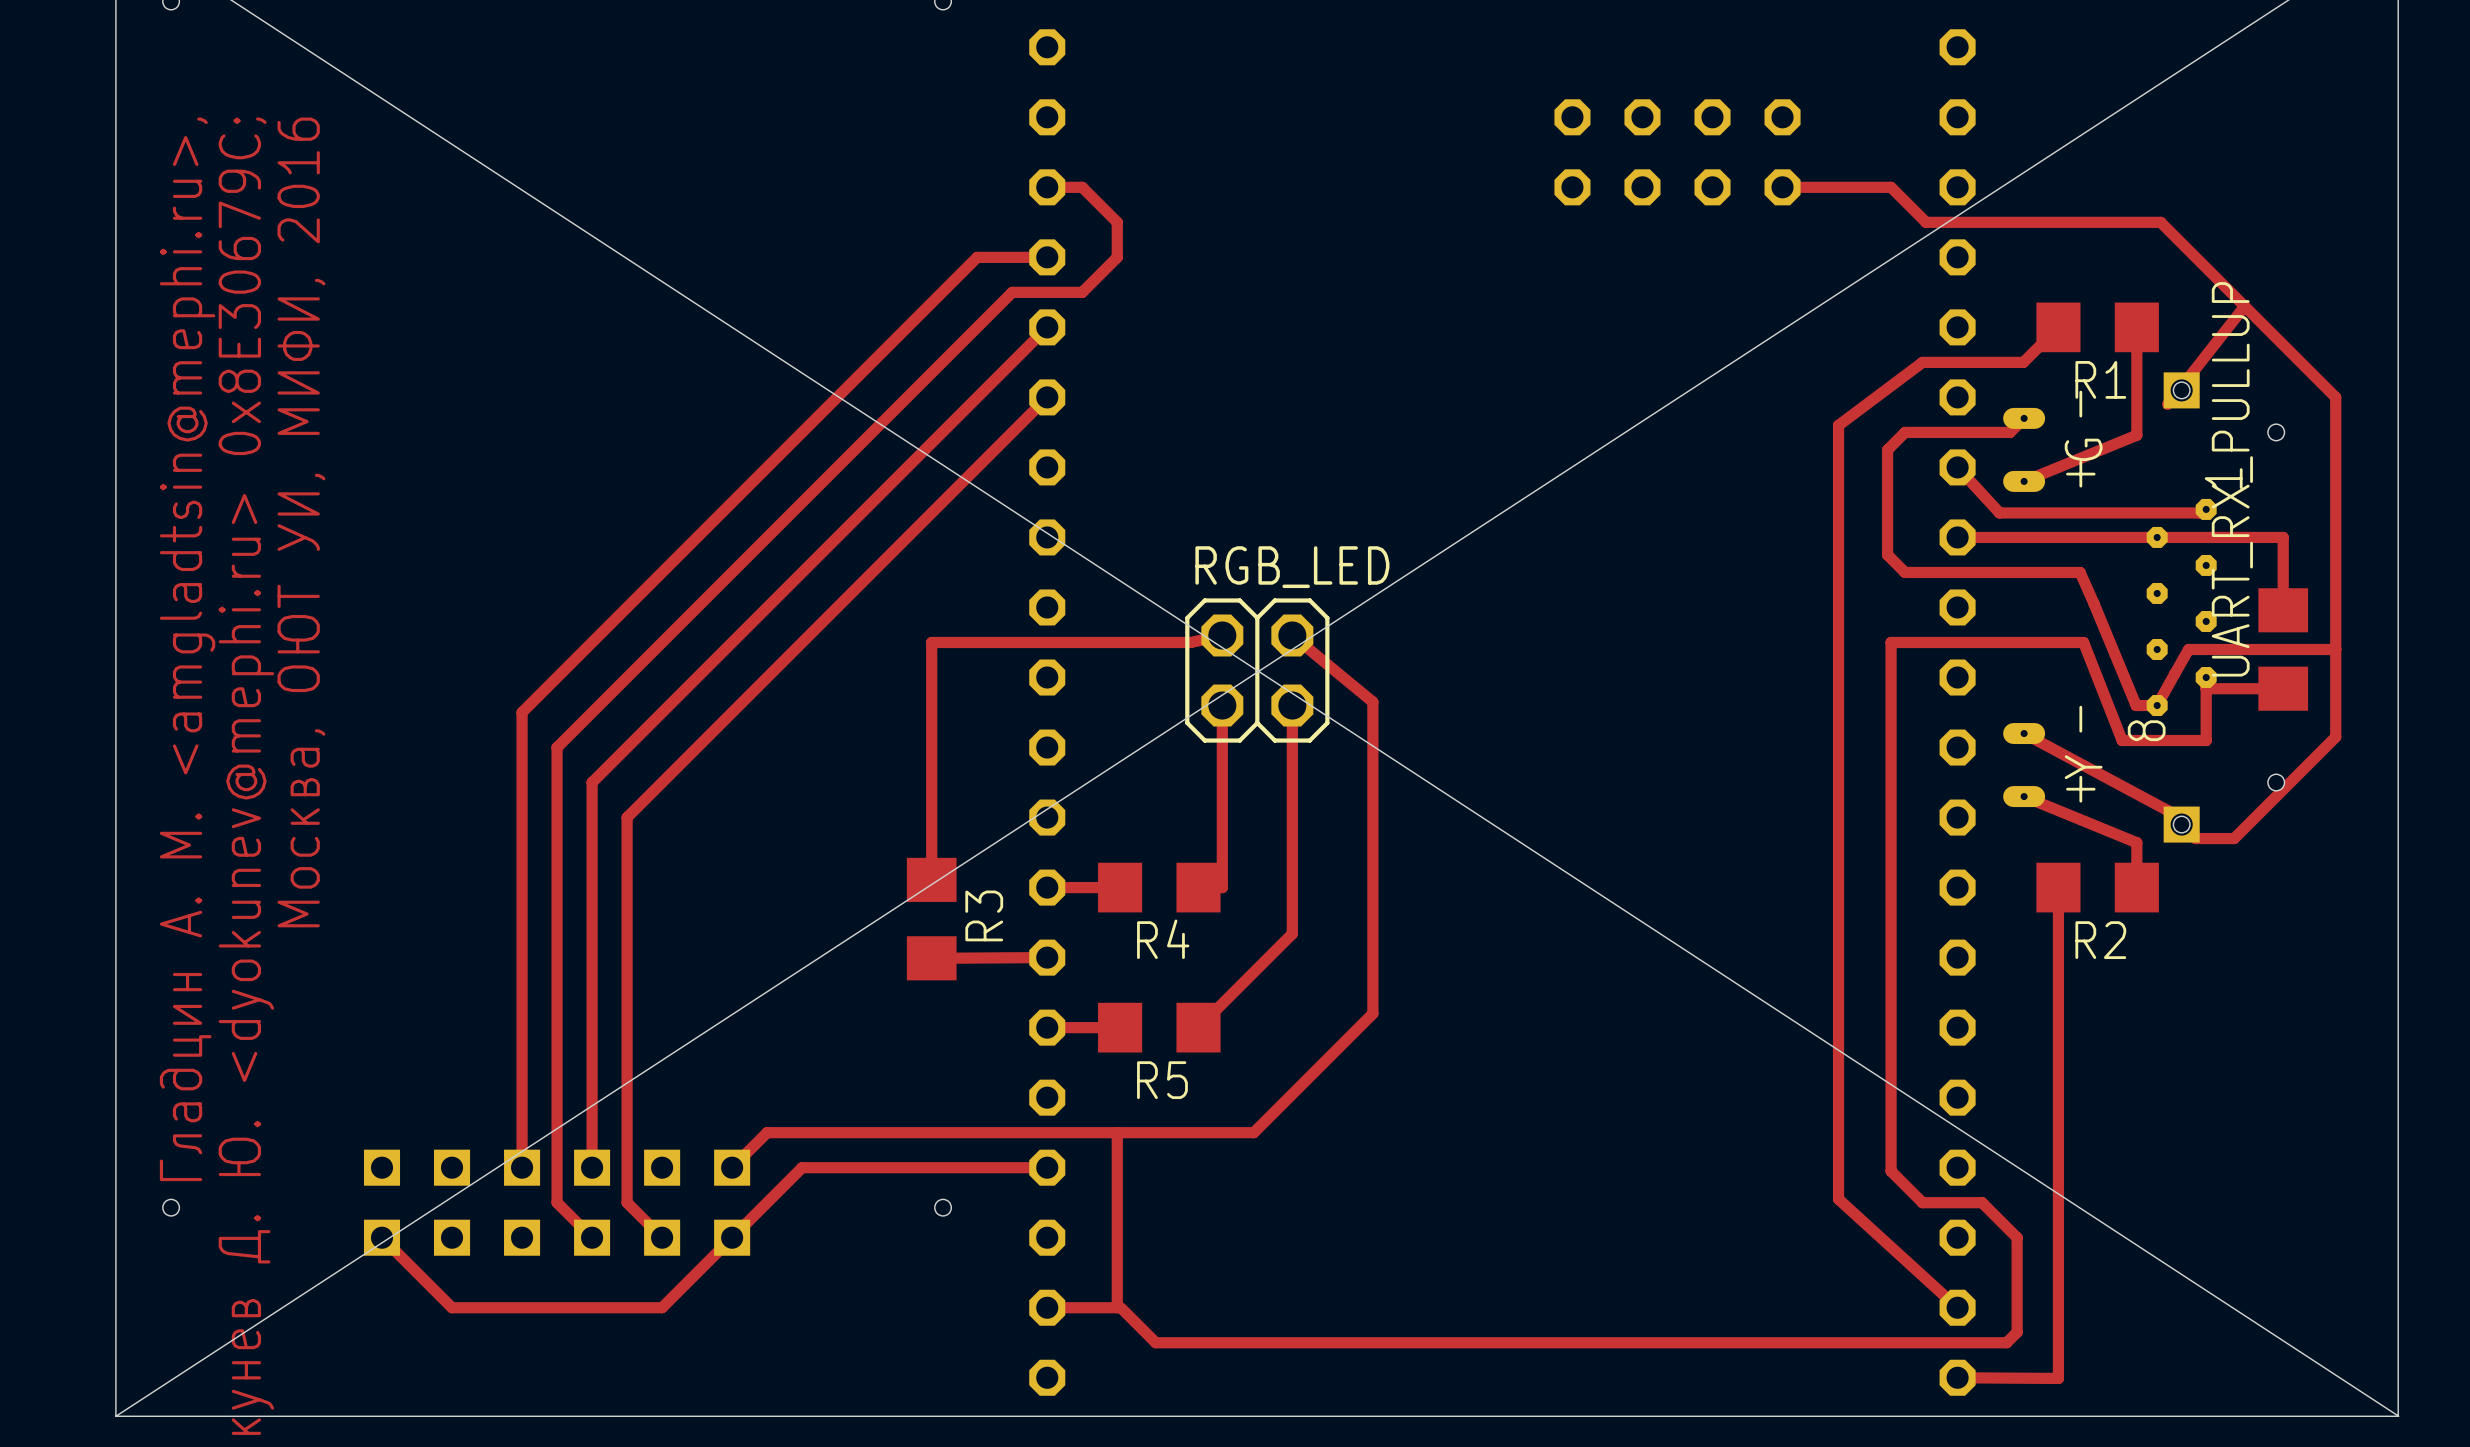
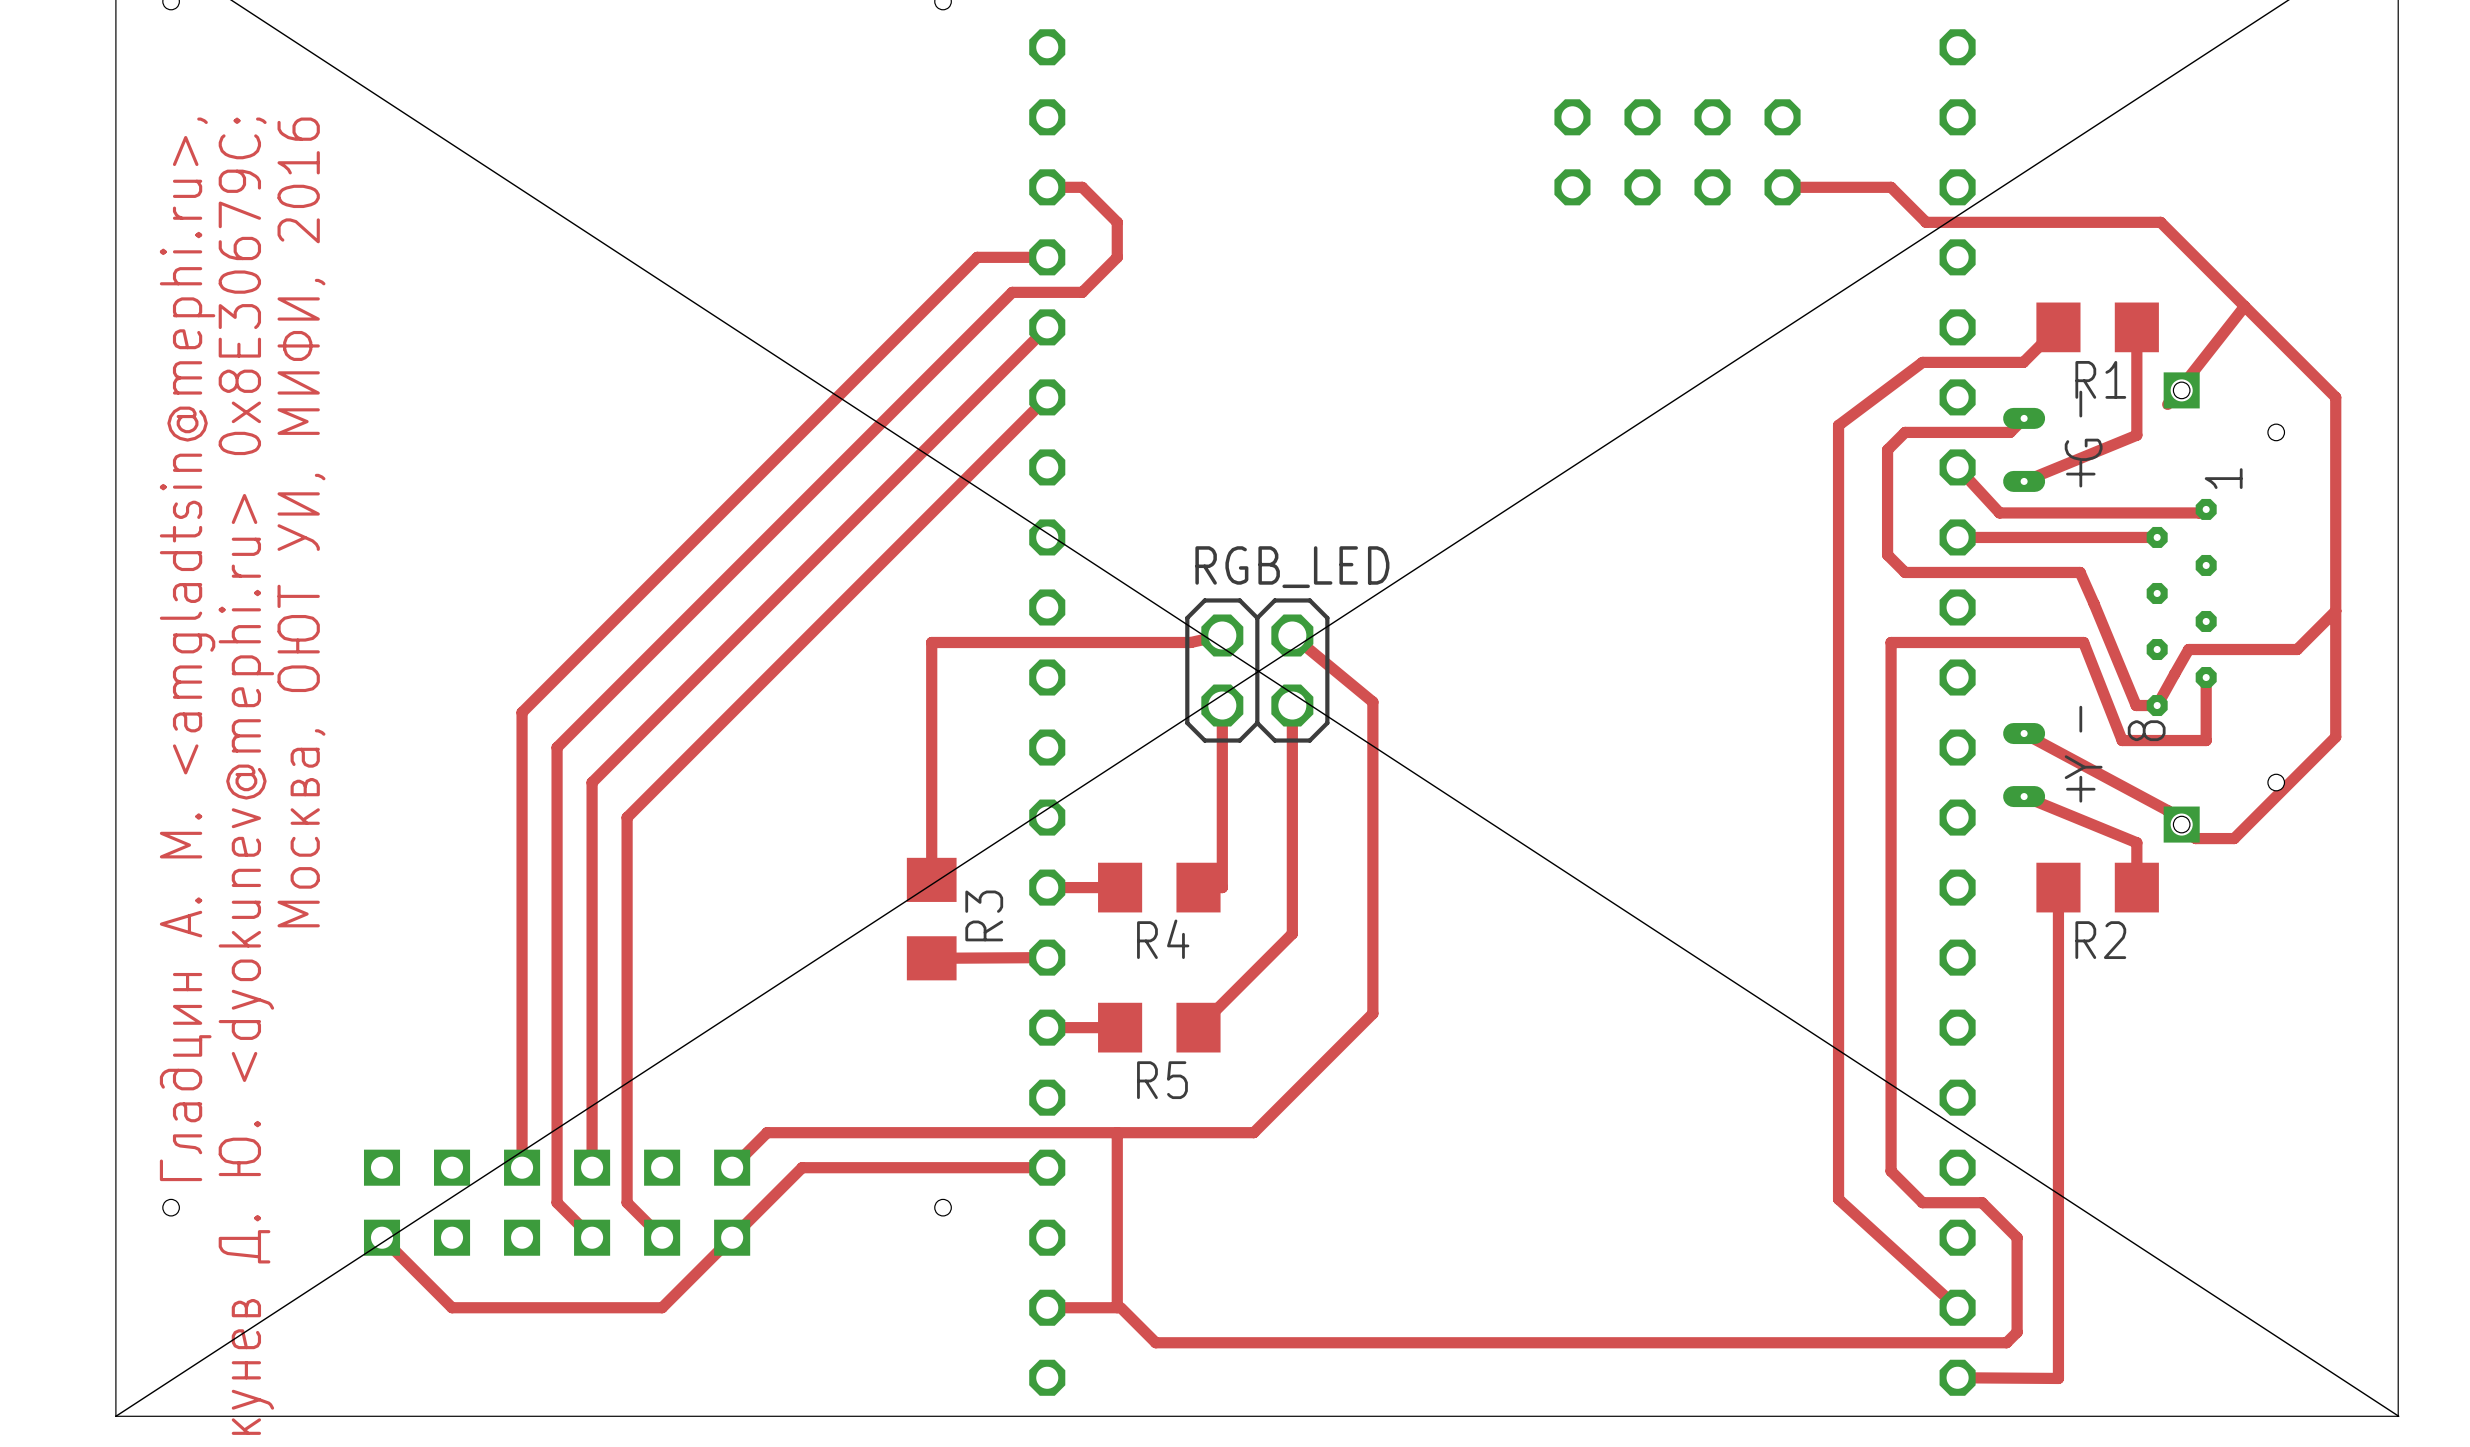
track: (2157, 537) (2283, 537) (2283, 610) -> none
UART_RX_PULLUP: (2283, 649) -> none
track: (2297, 649) (2335, 649) -> (2297, 649) (2335, 610)
track: (2206, 688) (2283, 688) -> none

